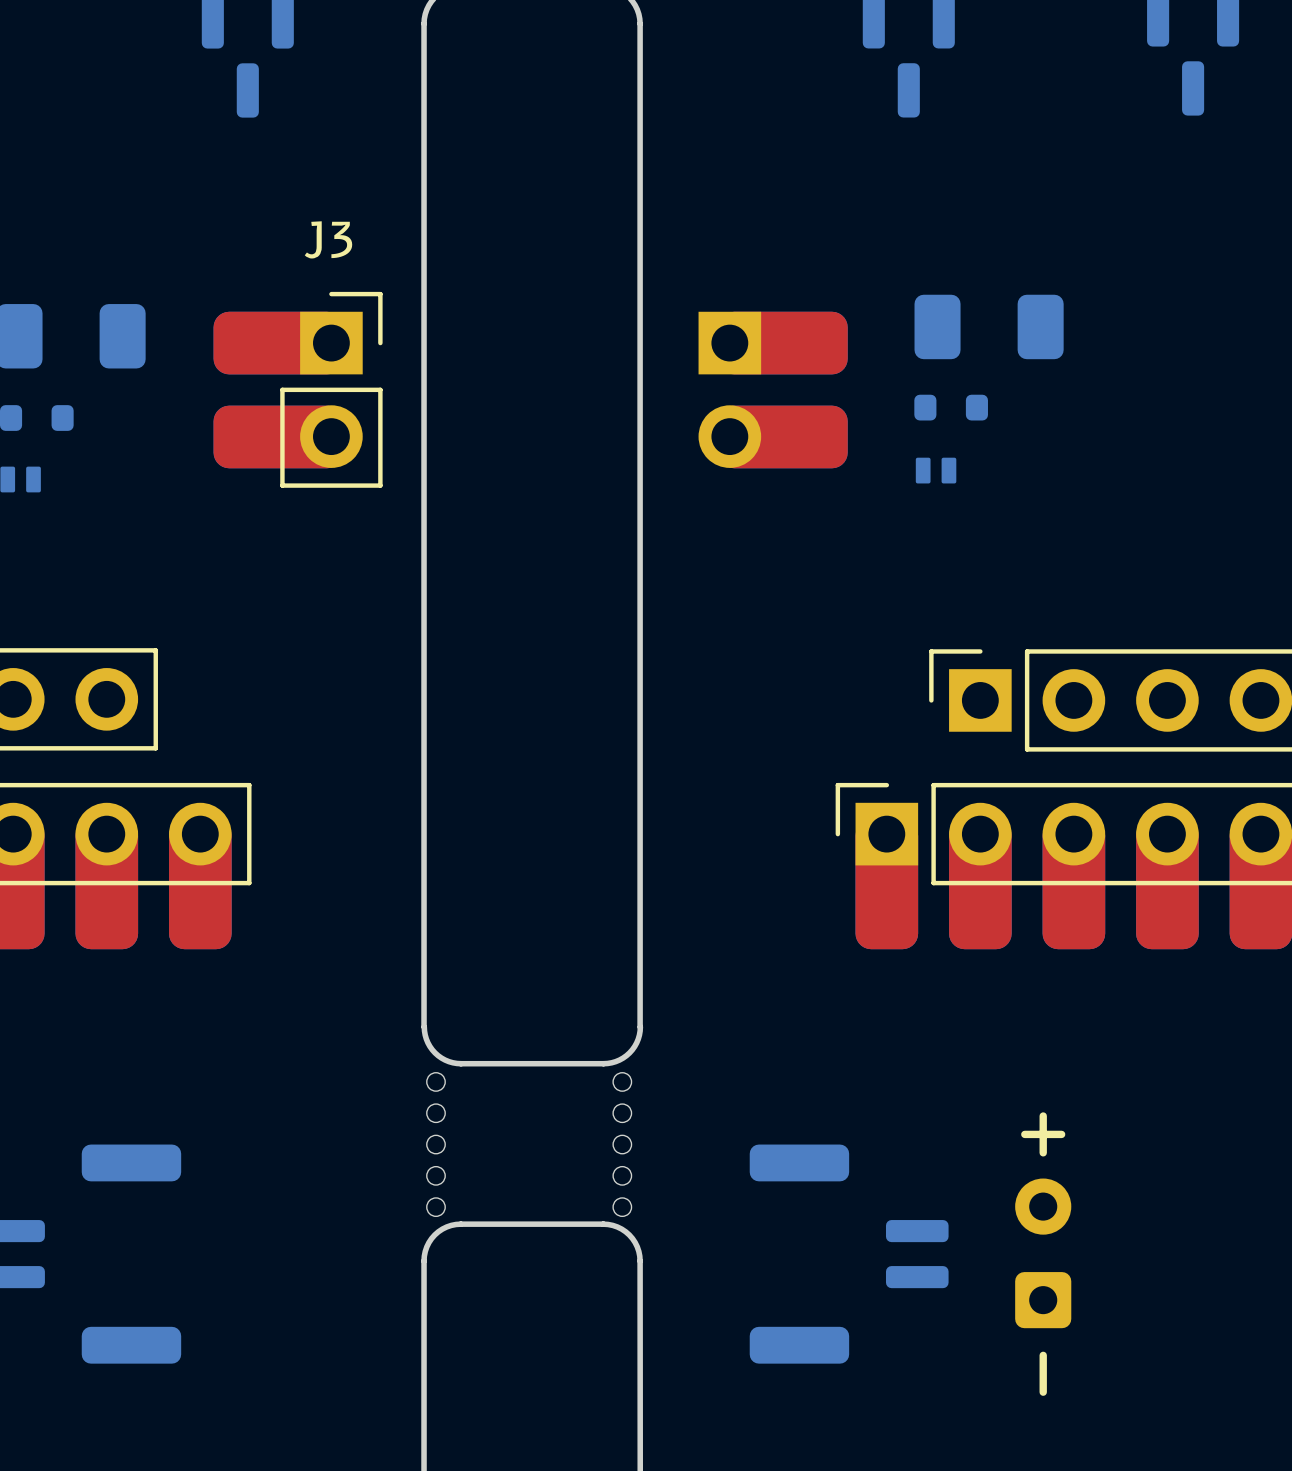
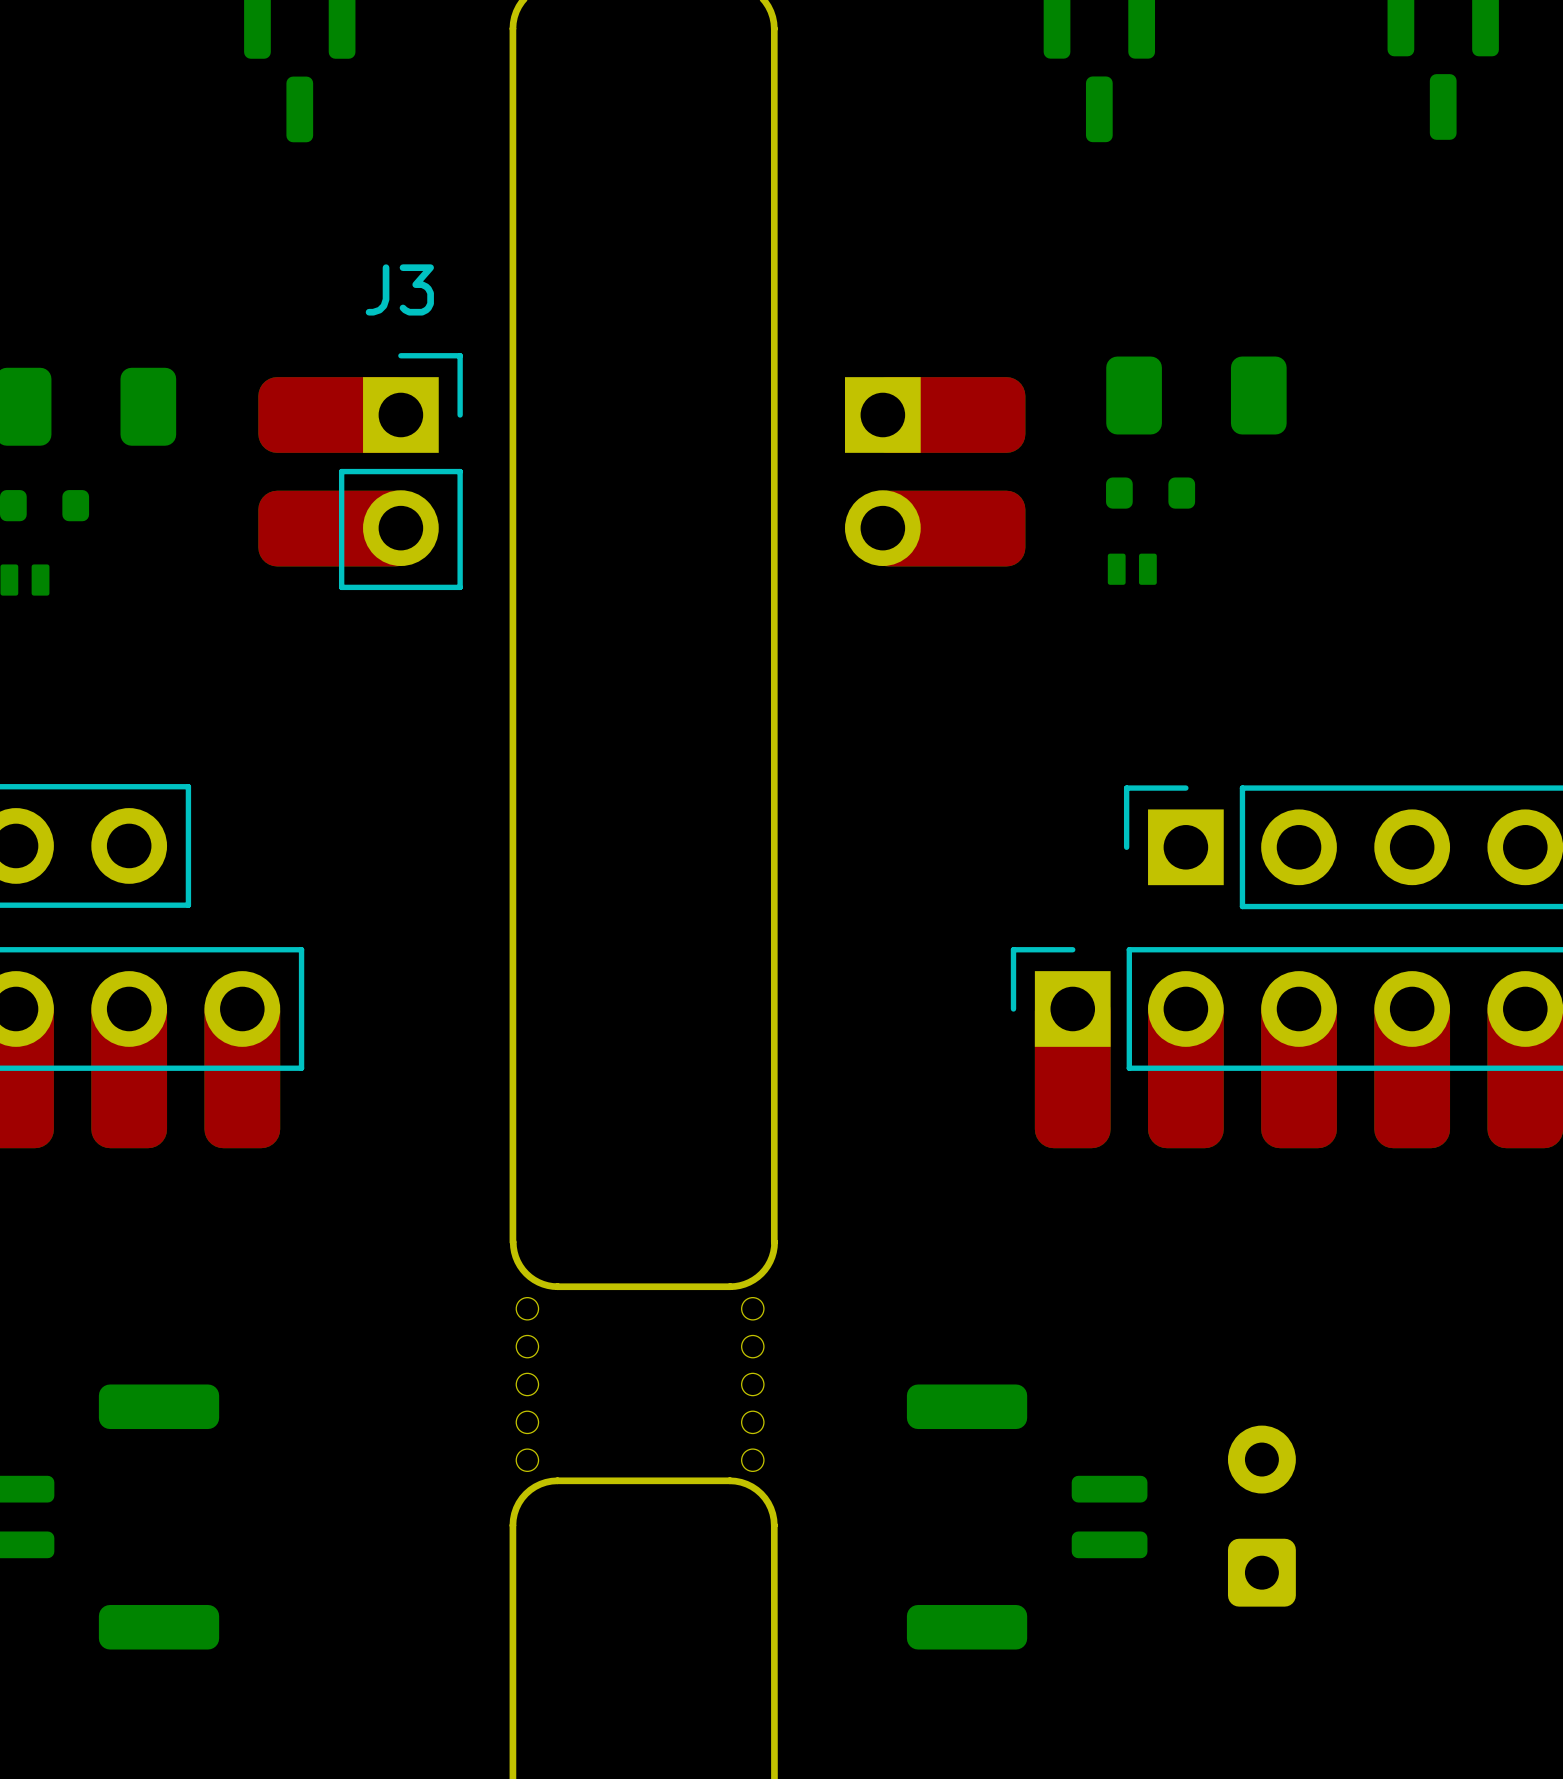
part side: top (1043, 1254) -> bottom (1261, 1516)

